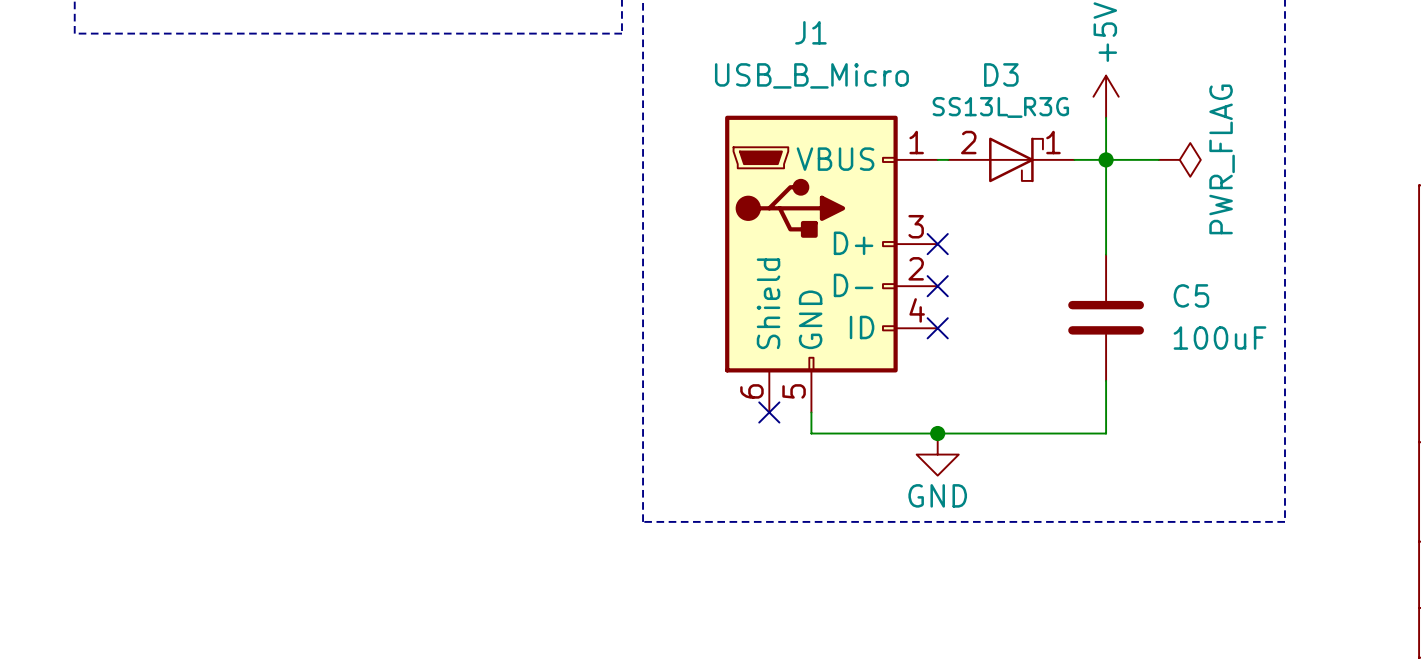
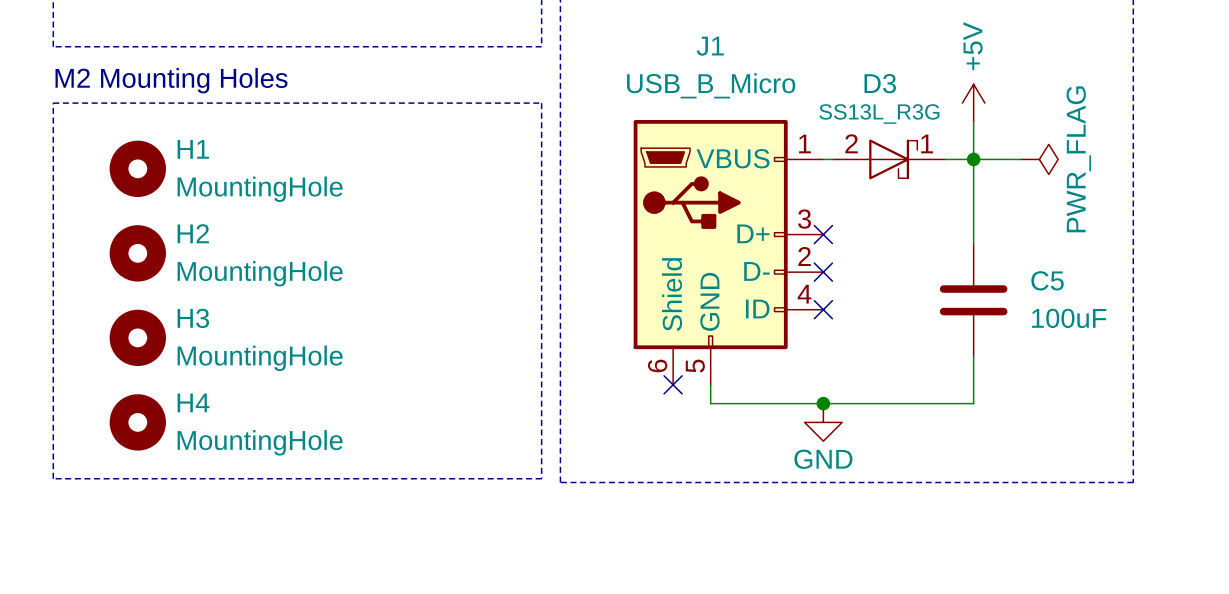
text: none -> M2 Mounting Holes (171, 80)
line: none -> (53, 103) (541, 103) (541, 478) (53, 478) (53, 103)
H1: none -> MountingHole (137, 168)
H2: none -> MountingHole (137, 253)
H3: none -> MountingHole (137, 337)
H4: none -> MountingHole (137, 422)

